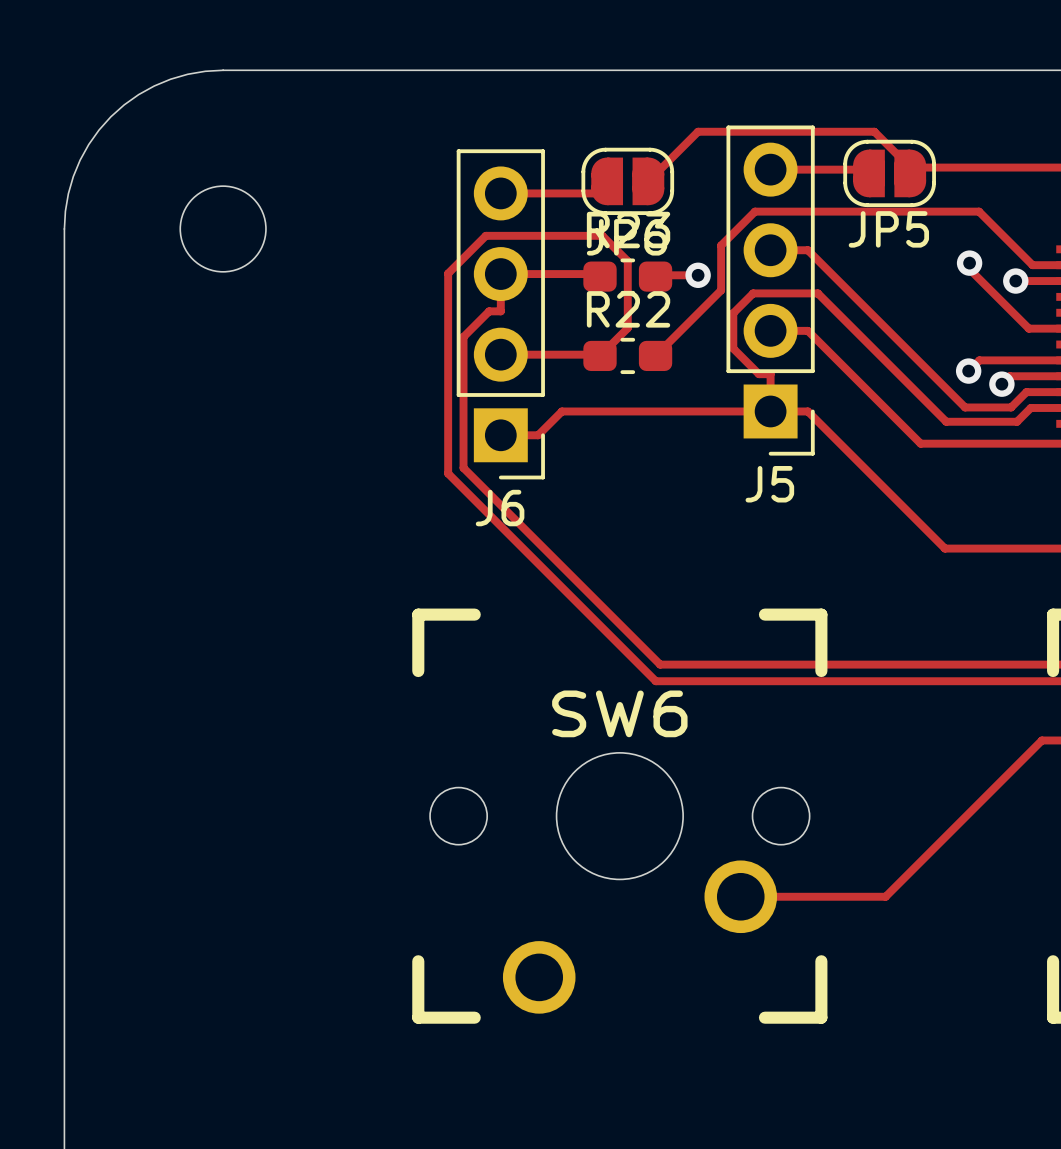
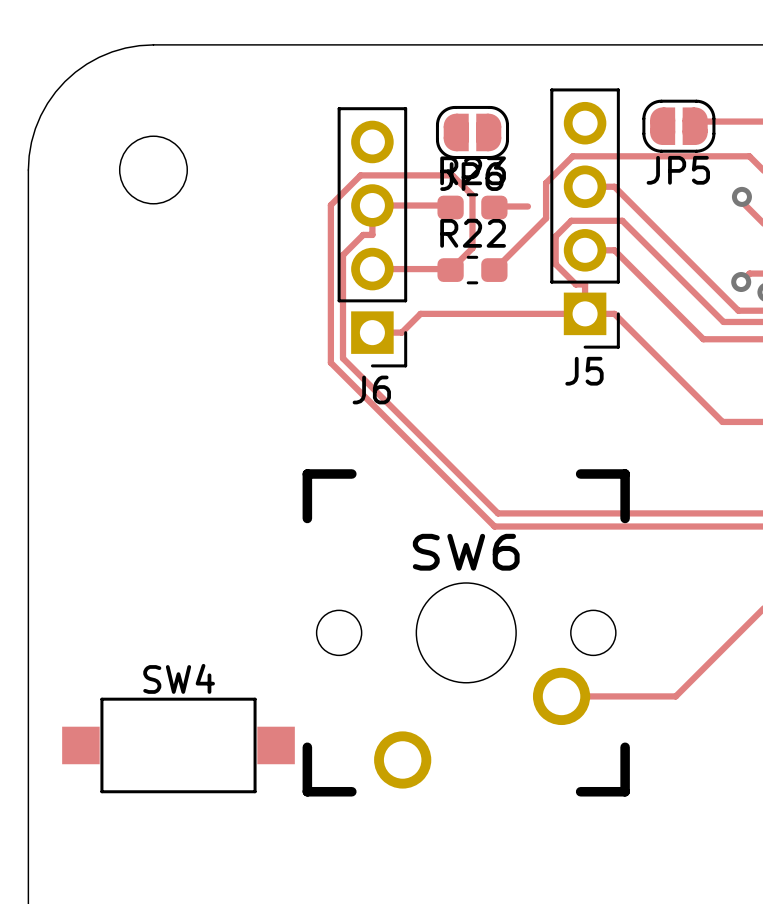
track: (770, 169) (865, 169) (868, 173) -> none
track: (913, 170) (874, 131) (698, 131) (648, 181) -> none
track: (607, 181) (595, 193) (500, 193) -> none
via: (698, 275) -> none
SW4: none -> (178, 745)

